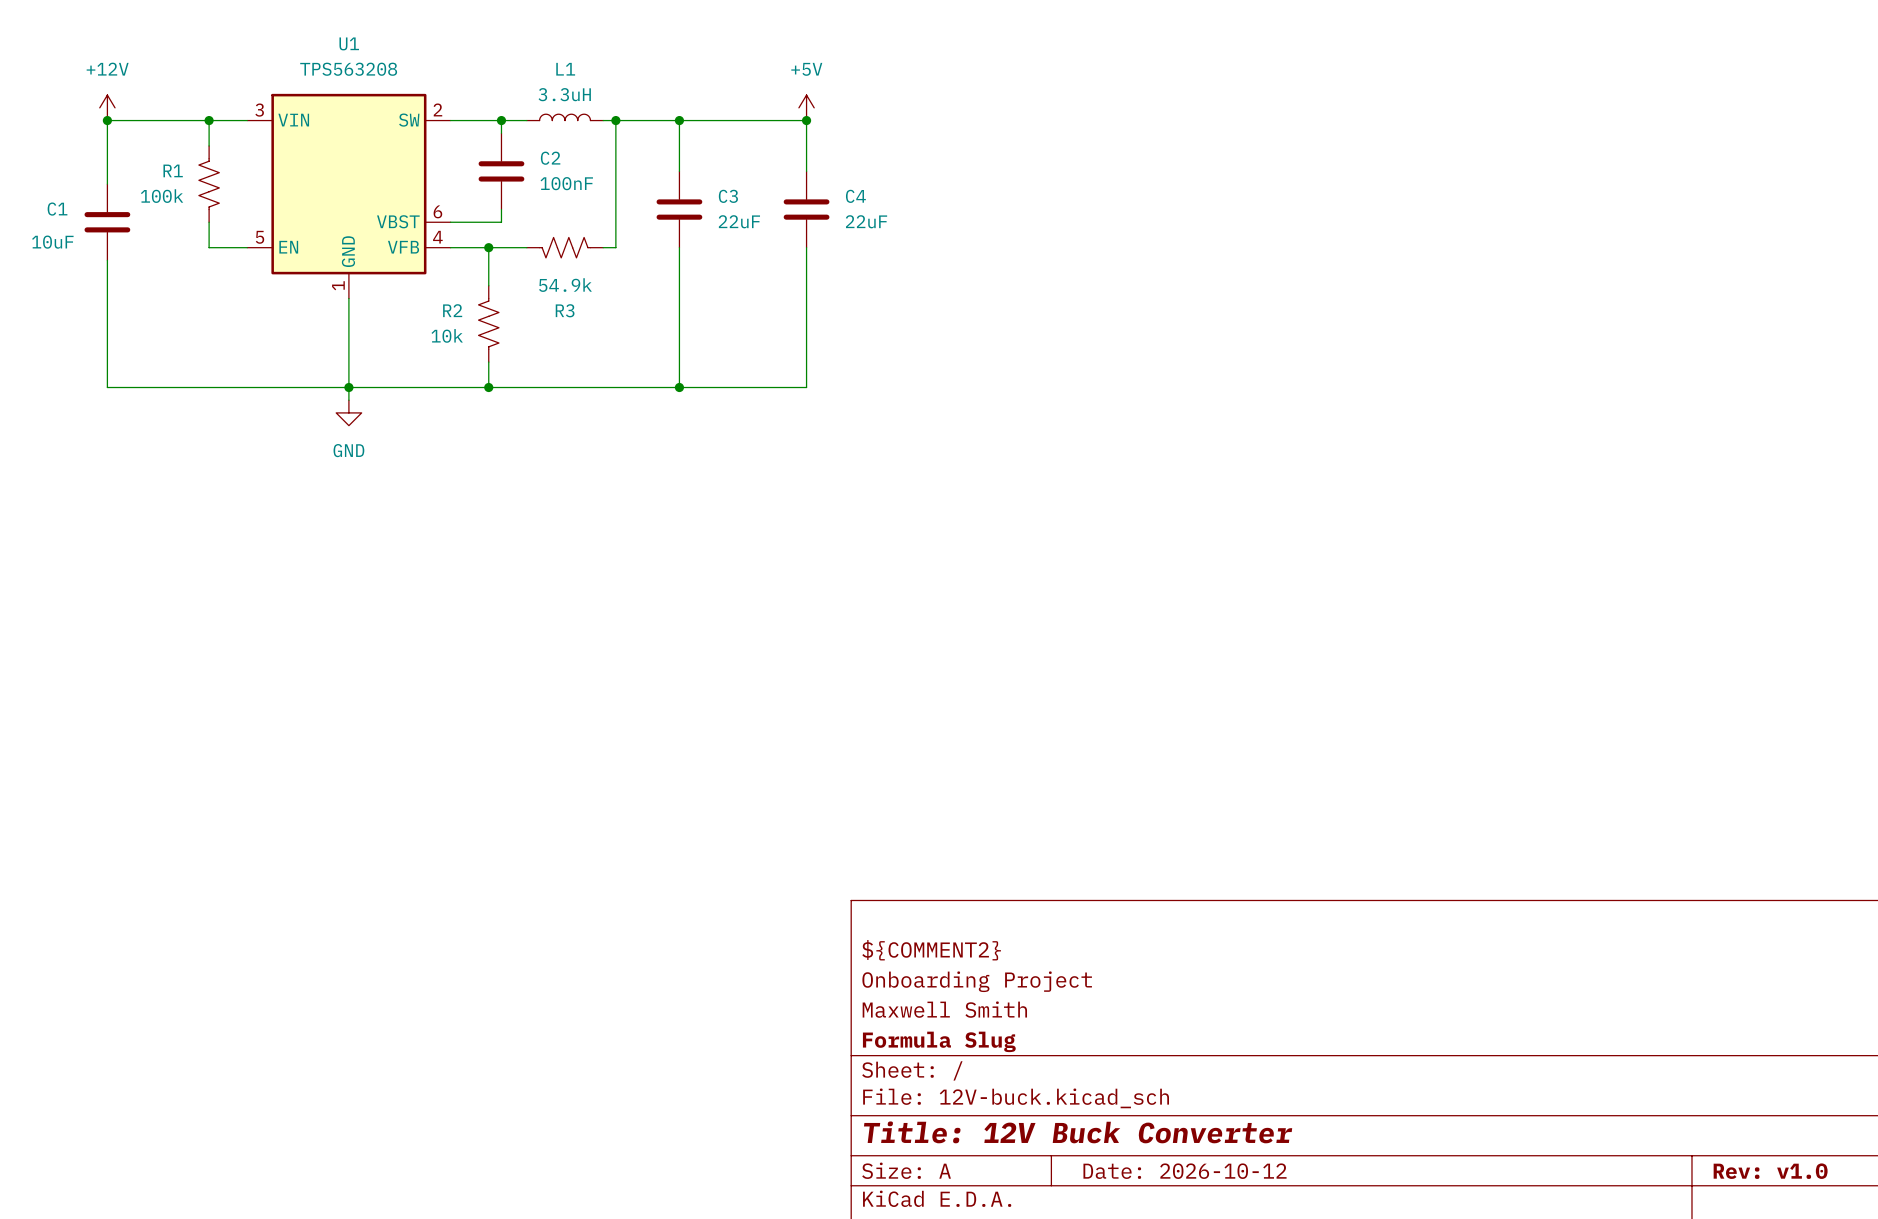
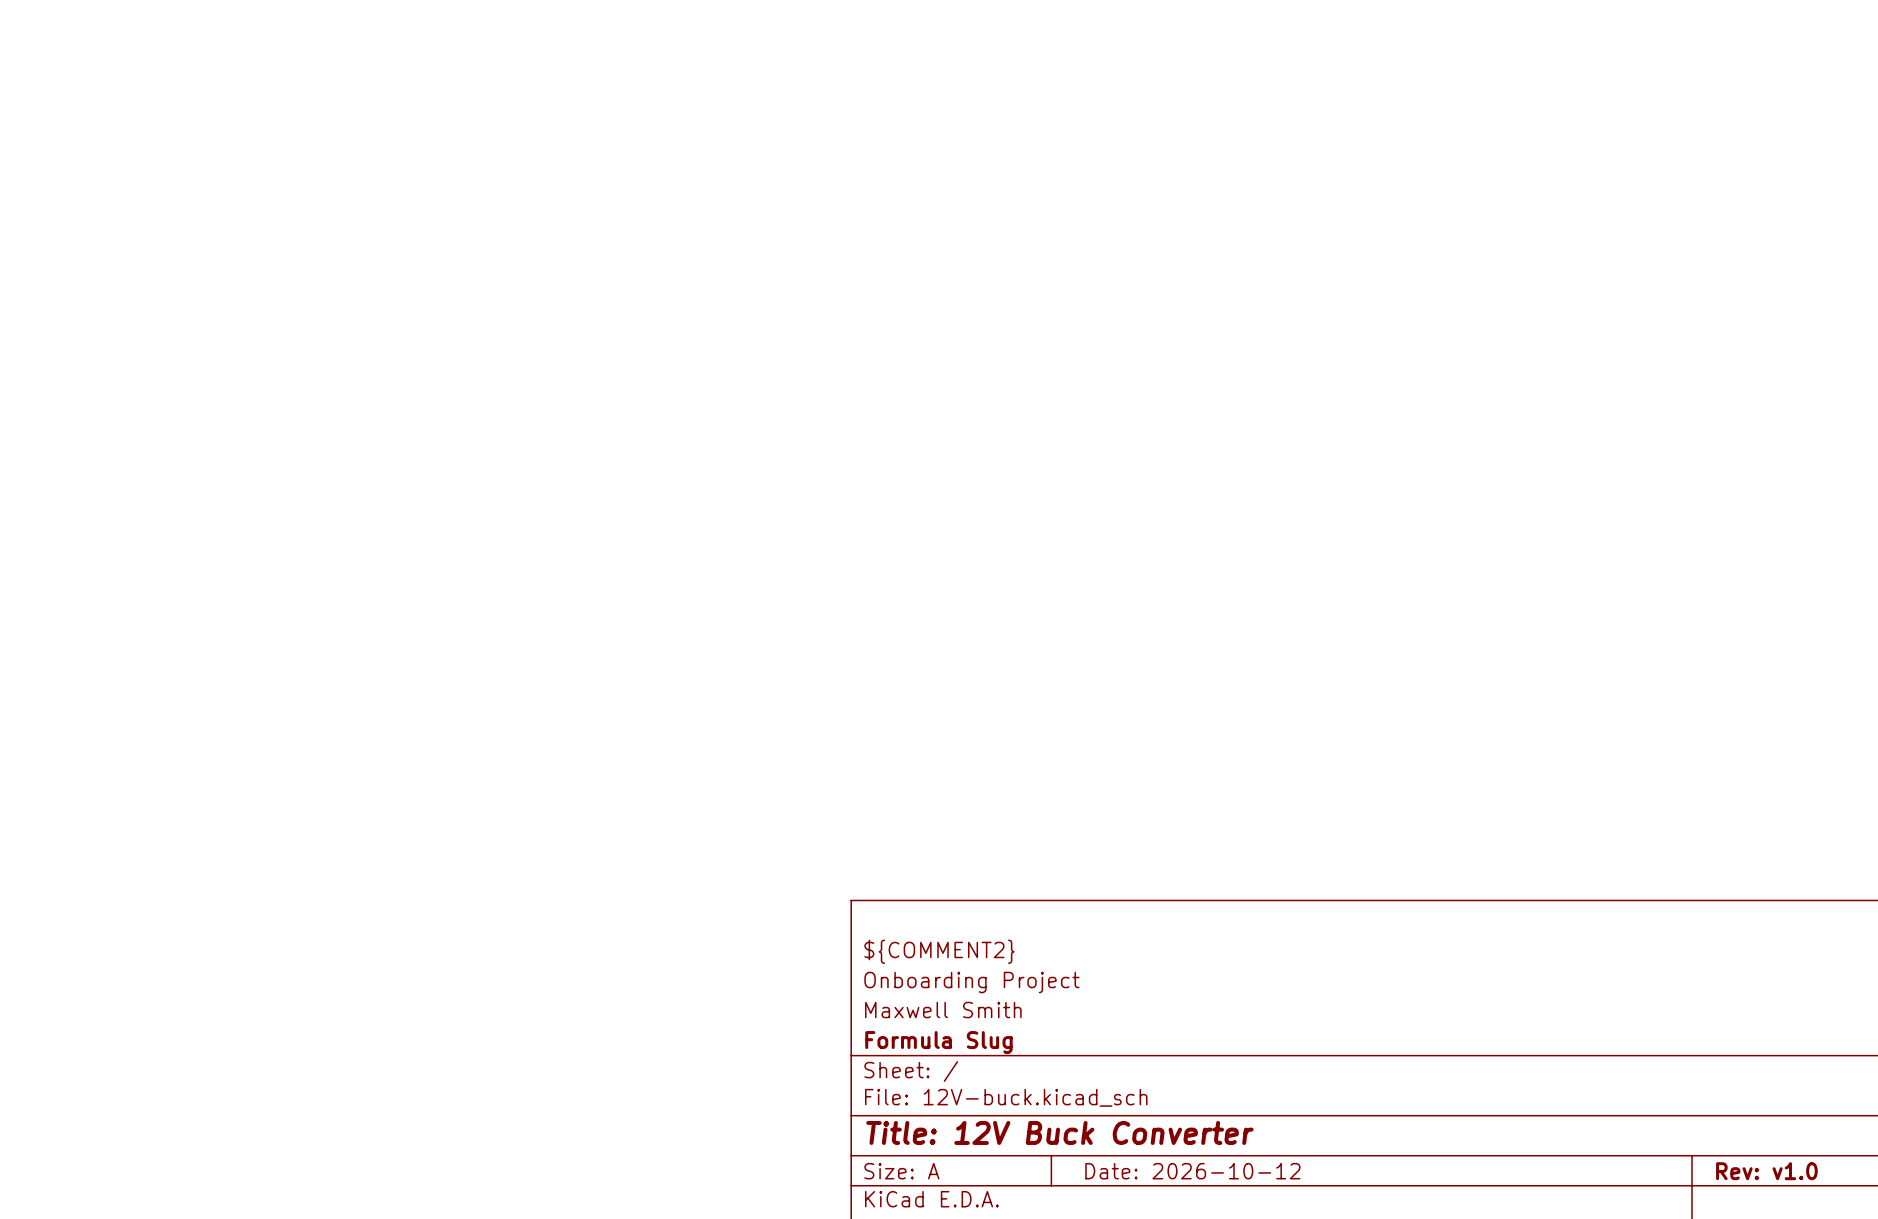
power symbol: +12V (107, 107) -> none
power symbol: +5V (806, 107) -> none
L1: 3.3uH (565, 117) -> none
junction: (107, 120) -> none
wire: (209, 120) (209, 145) -> none
junction: (209, 120) -> none
wire: (247, 120) (107, 120) (107, 184) -> none
wire: (450, 120) (526, 120) -> none
wire: (501, 120) (501, 133) -> none
junction: (501, 120) -> none
wire: (603, 120) (806, 120) (806, 171) -> none
wire: (615, 120) (615, 247) (603, 247) -> none
junction: (615, 120) -> none
wire: (679, 120) (679, 171) -> none
junction: (679, 120) -> none
junction: (806, 120) -> none
C2: 100nF (501, 171) -> none
R1: 100k (209, 184) -> none
U1: TPS563208 (348, 196) -> none
wire: (501, 209) (501, 222) (450, 222) -> none
C3: 22uF (679, 209) -> none
C4: 22uF (806, 209) -> none
C1: 10uF (107, 222) -> none
wire: (209, 222) (209, 247) (247, 247) -> none
wire: (450, 247) (526, 247) -> none
wire: (488, 247) (488, 285) -> none
junction: (488, 247) -> none
R3: 54.9k (565, 247) -> none
wire: (679, 247) (679, 387) -> none
wire: (806, 247) (806, 387) (107, 387) (107, 260) -> none
wire: (348, 298) (348, 400) -> none
R2: 10k (488, 323) -> none
wire: (488, 362) (488, 387) -> none
junction: (348, 387) -> none
junction: (488, 387) -> none
junction: (679, 387) -> none
power symbol: GND (348, 412) -> none

